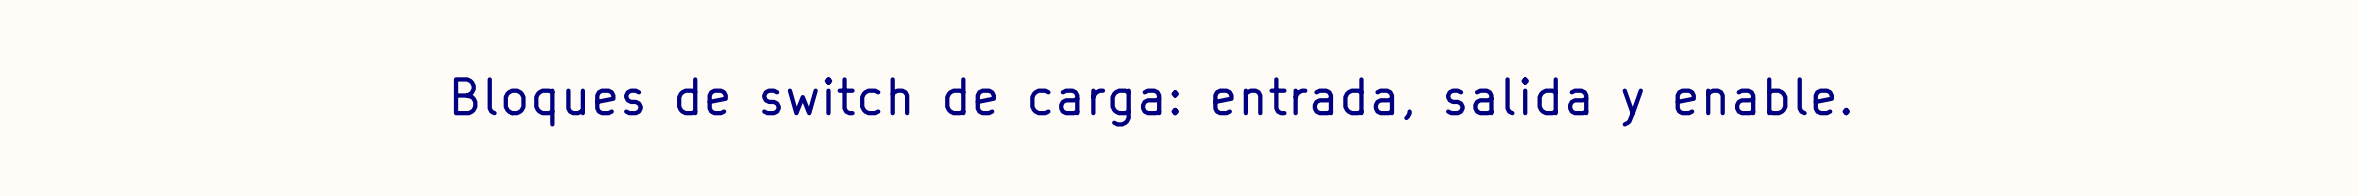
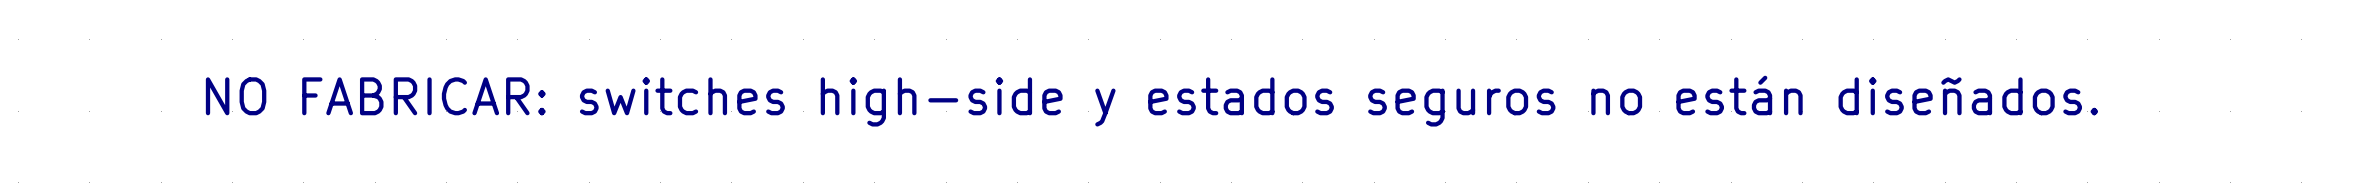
text: Bloques de switch de carga: entrada, salida y enable. (1151, 101) -> NO FABRICAR: switches high-side y estados seguros no están diseñados. (1151, 101)

